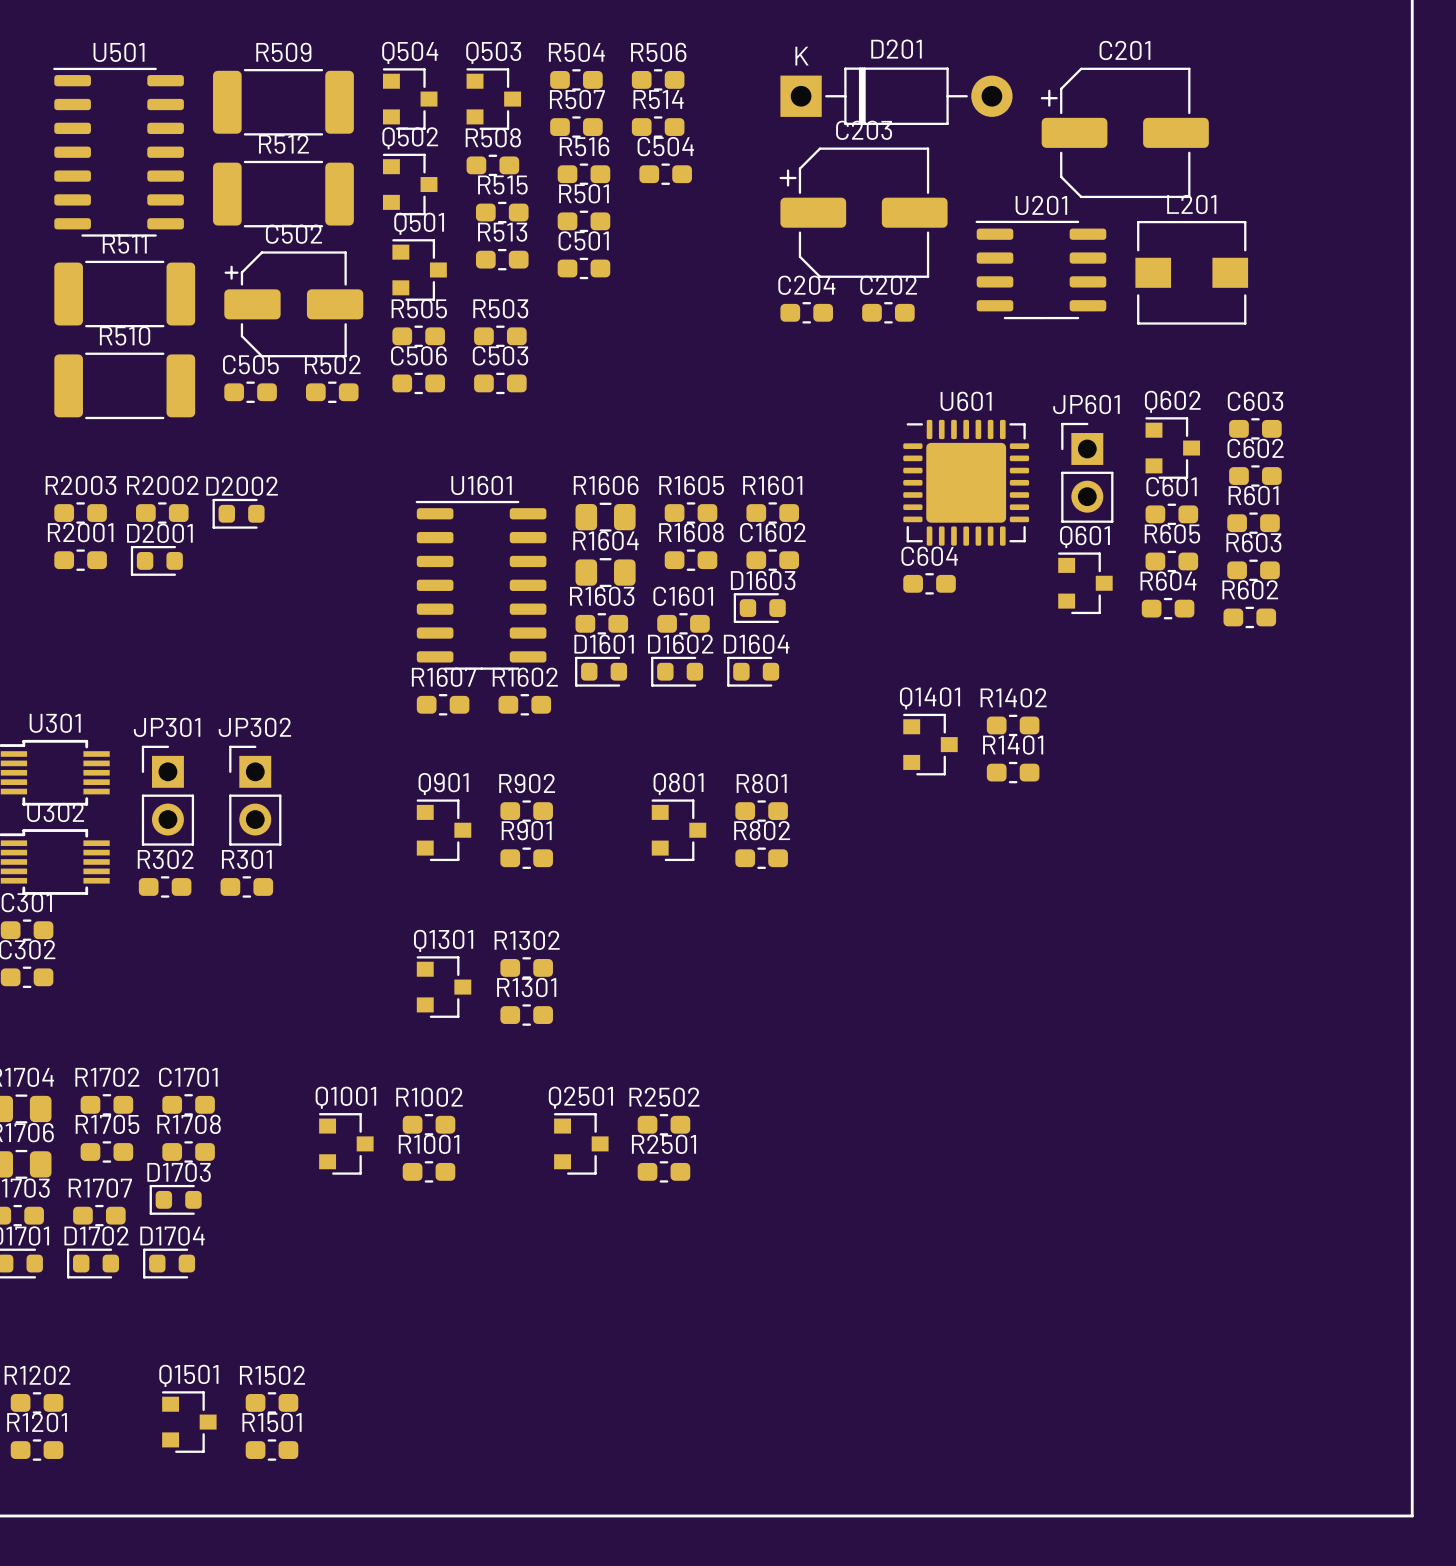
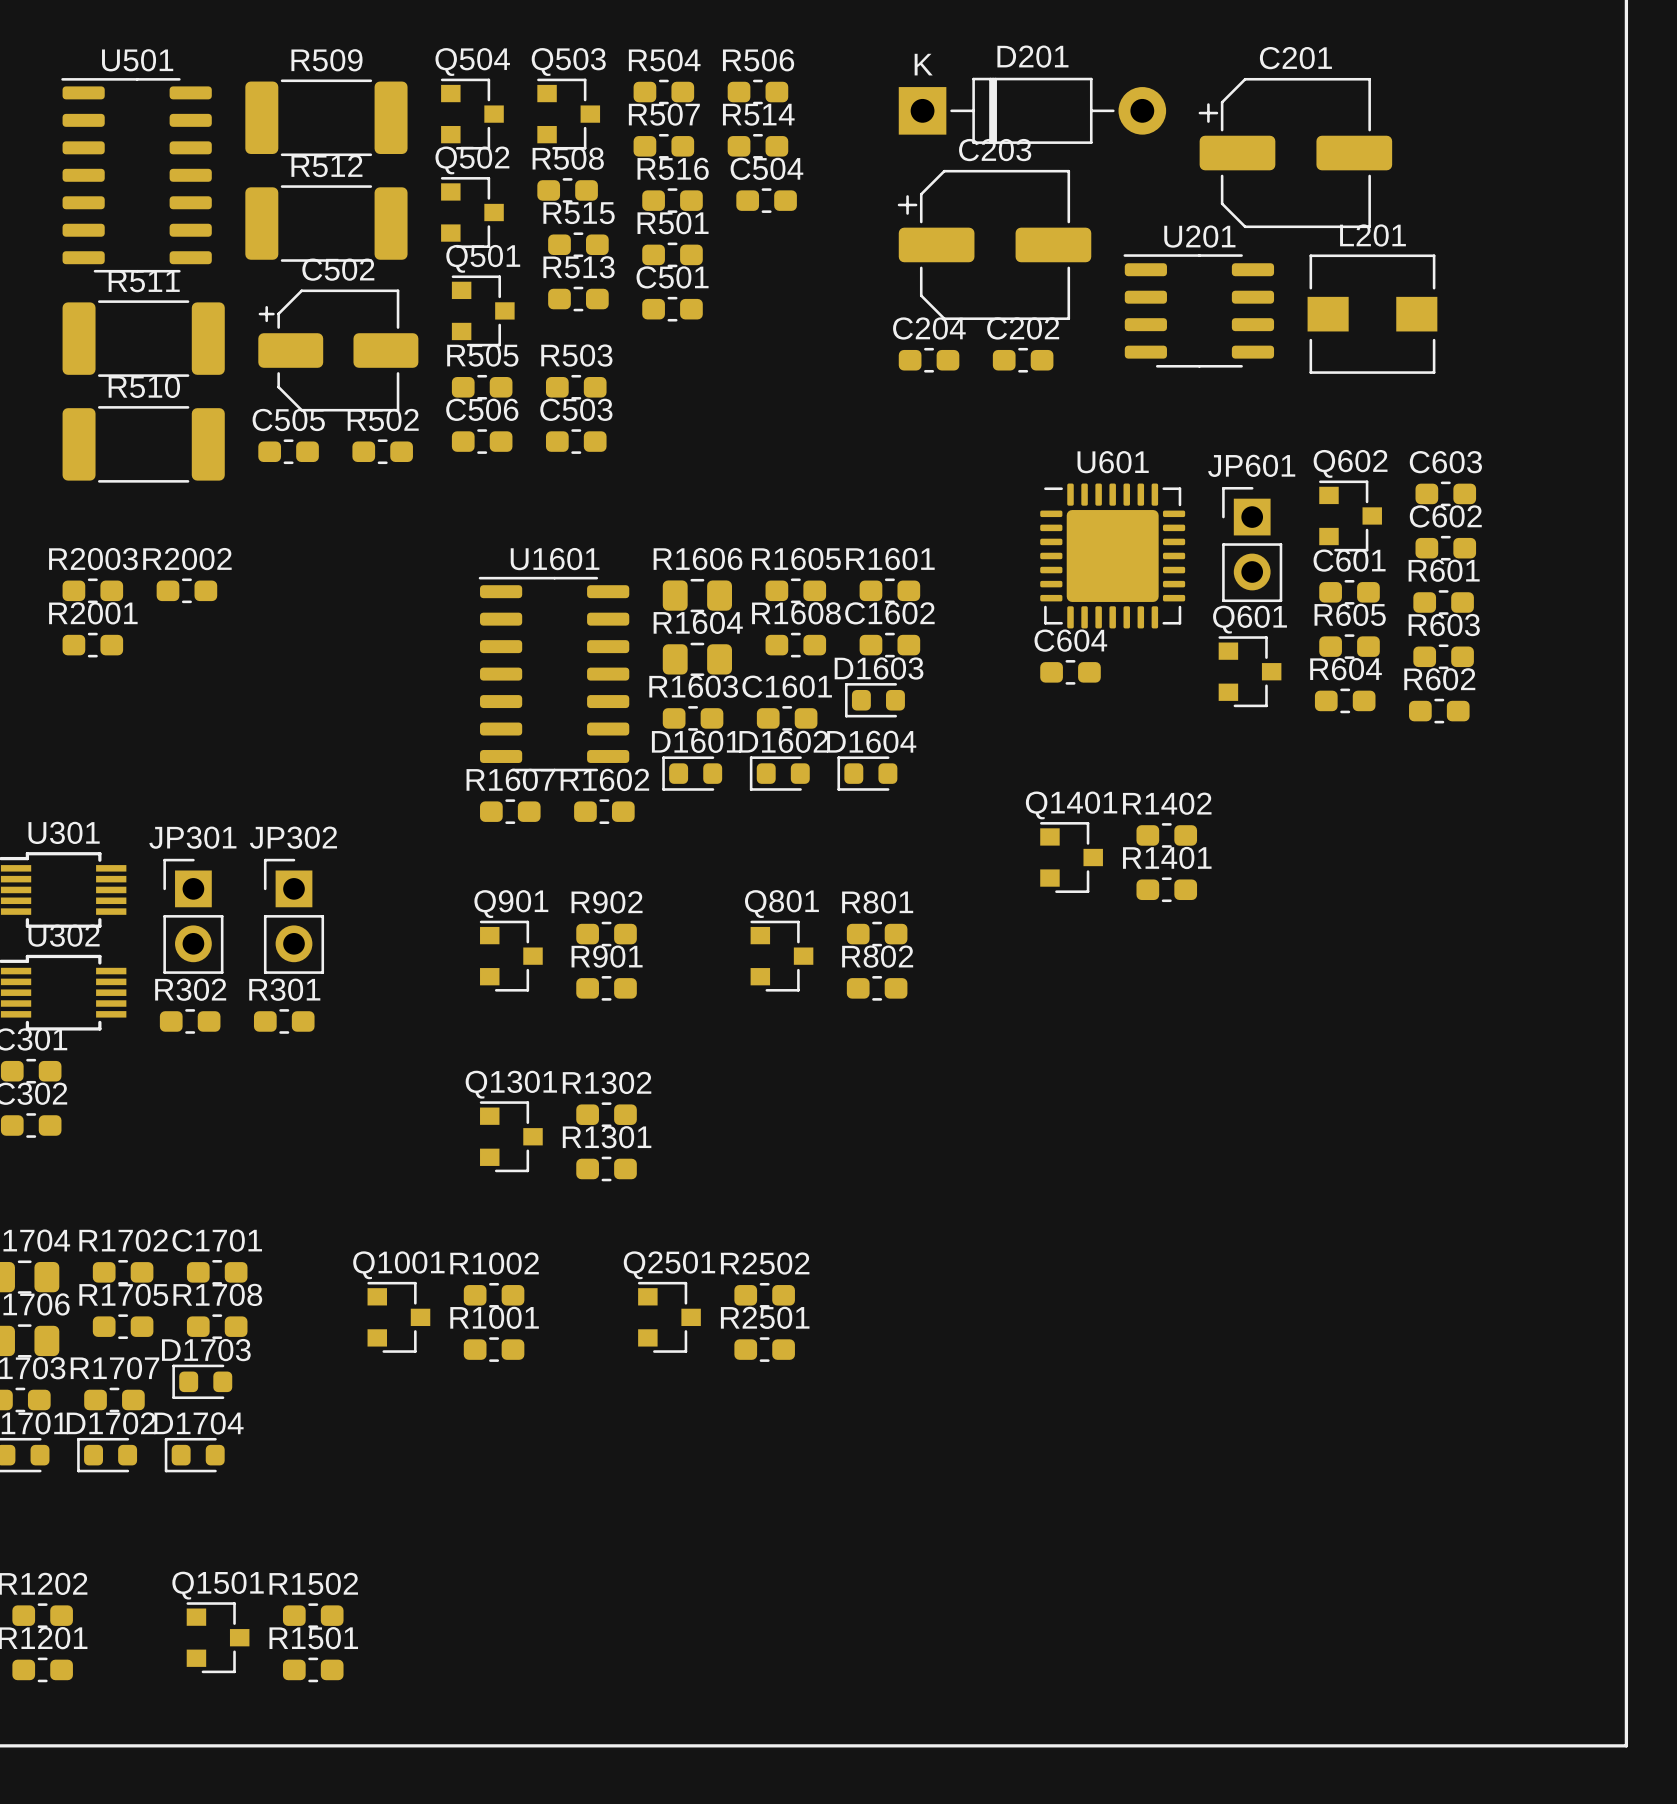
D2002: (238, 513) -> none
D2001: (156, 560) -> none

